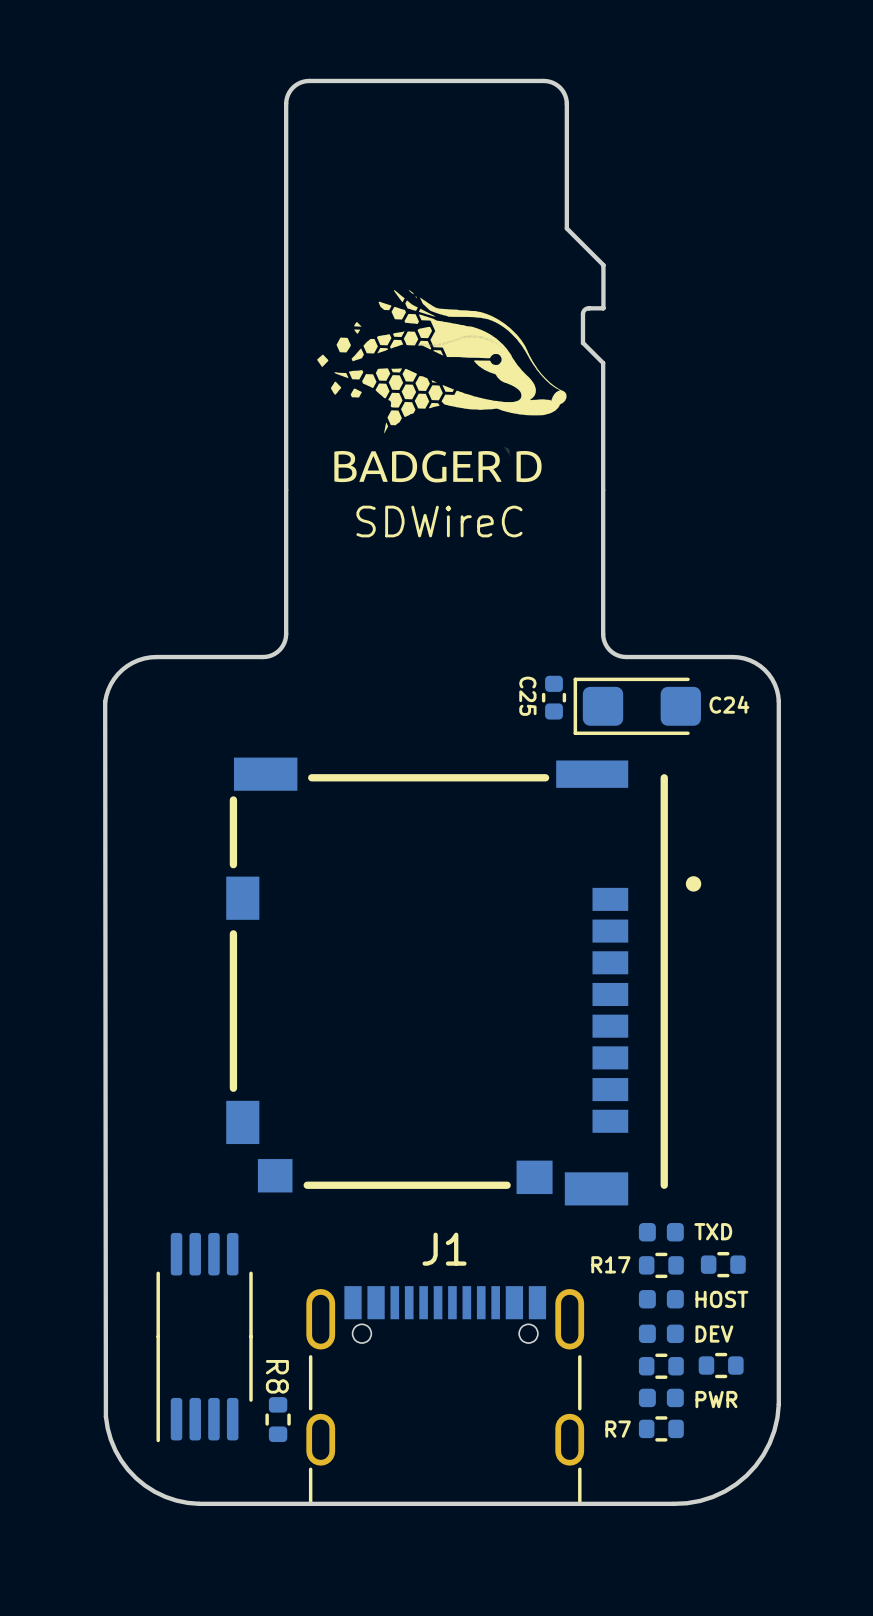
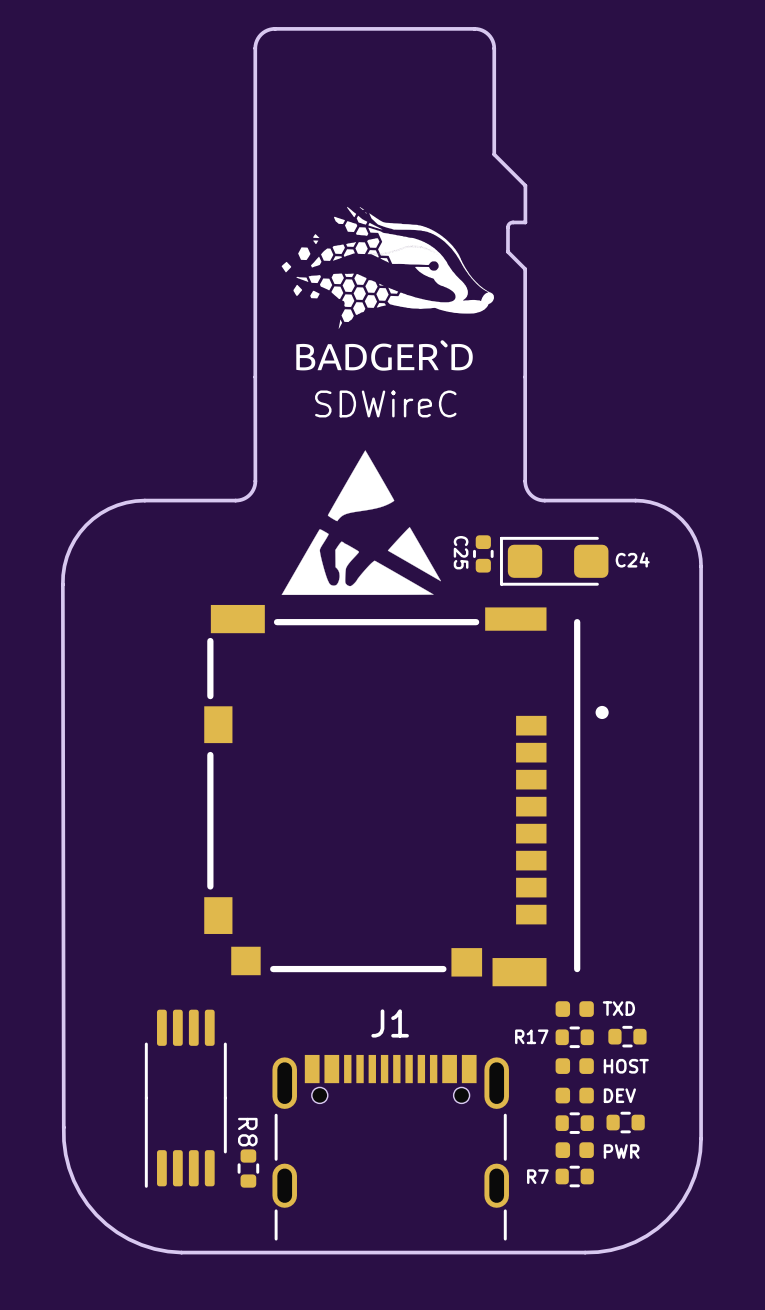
text: none -> ` (444, 343)
board edge: (286, 489) (286, 633) (281, 648) (274, 653) (266, 656) (144, 658) (132, 662) (117, 674) (108, 689) (105, 701) (105, 1416) (110, 1439) (121, 1460) (145, 1485) (165, 1496) (199, 1503) (686, 1503) (712, 1496) (736, 1484) (755, 1465) (769, 1443) (777, 1417) (778, 1404) (778, 695) (768, 674) (755, 662) (744, 658) (626, 657) (617, 655) (609, 650) (603, 639) (603, 612) -> (255, 377) (255, 481) (249, 495) (237, 500) (135, 501) (108, 508) (93, 519) (80, 532) (66, 556) (63, 575) (63, 1141) (69, 1167) (73, 1180) (87, 1204) (106, 1224) (128, 1239) (141, 1244) (167, 1251) (181, 1252) (598, 1252) (623, 1246) (657, 1228) (675, 1210) (689, 1188) (698, 1164) (701, 1138) (701, 566) (699, 551) (694, 537) (682, 519) (670, 510) (657, 504) (635, 500) (540, 500) (529, 493) (525, 481)
drawing: none -> [281, 450, 441, 595]

